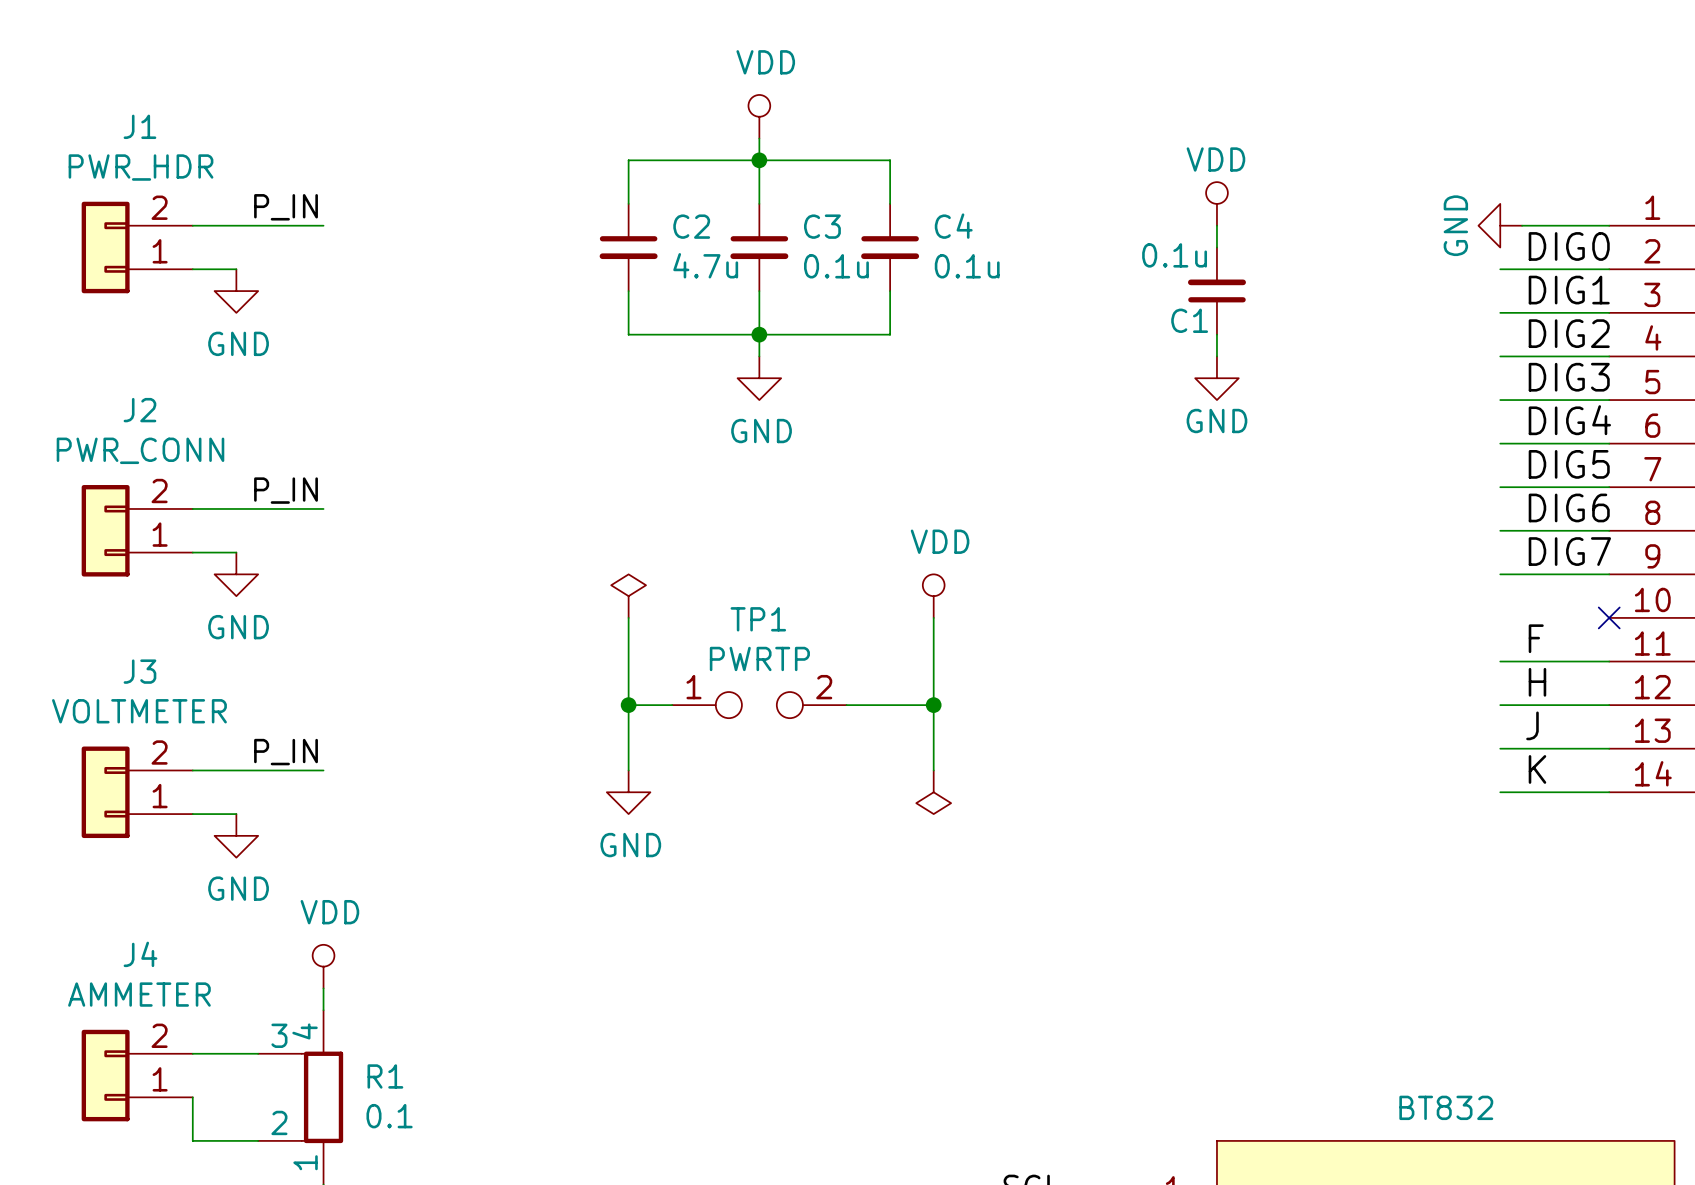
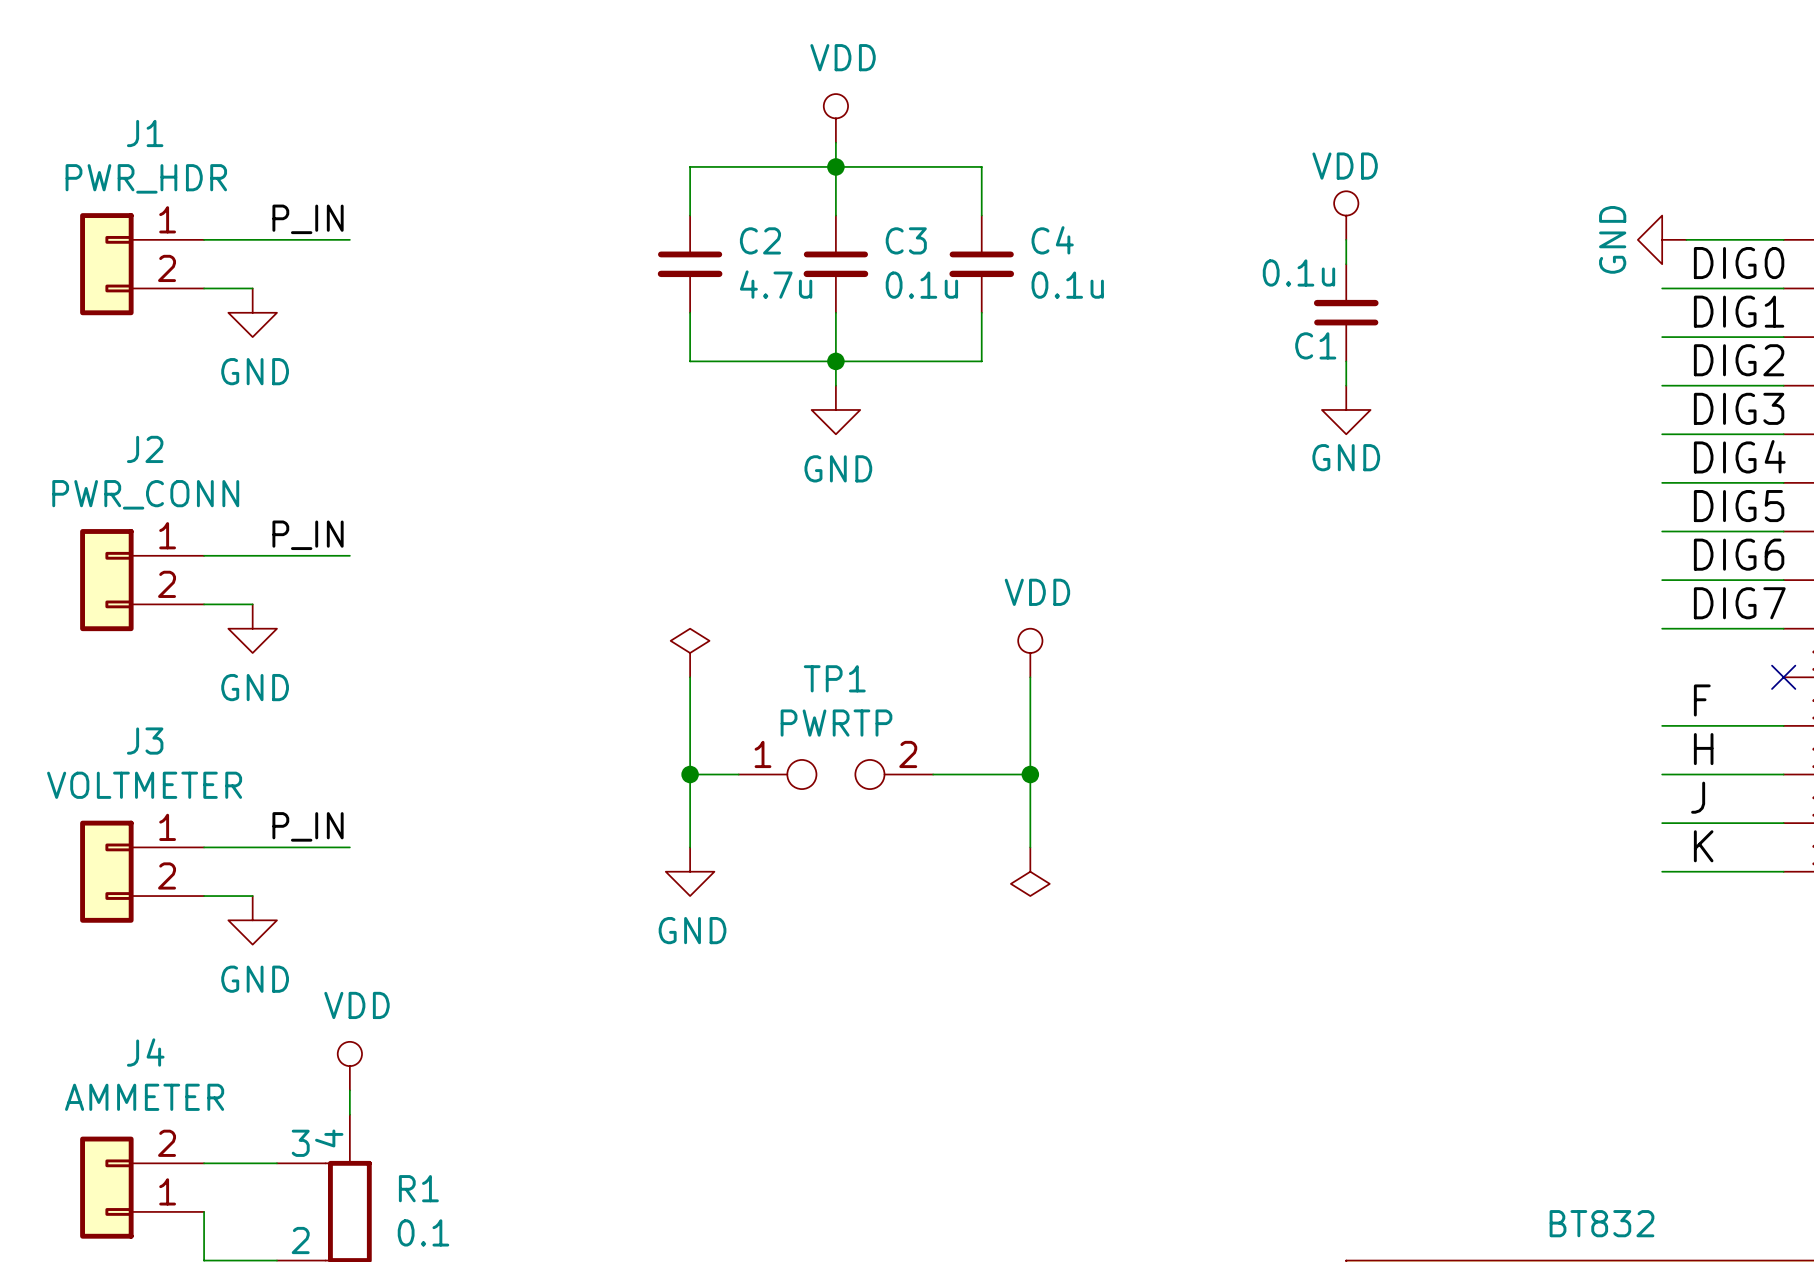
J1 flip: as is (105, 247) -> up-down (106, 264)
J2 flip: as is (105, 530) -> up-down (106, 580)
J3 flip: as is (105, 792) -> up-down (106, 871)

